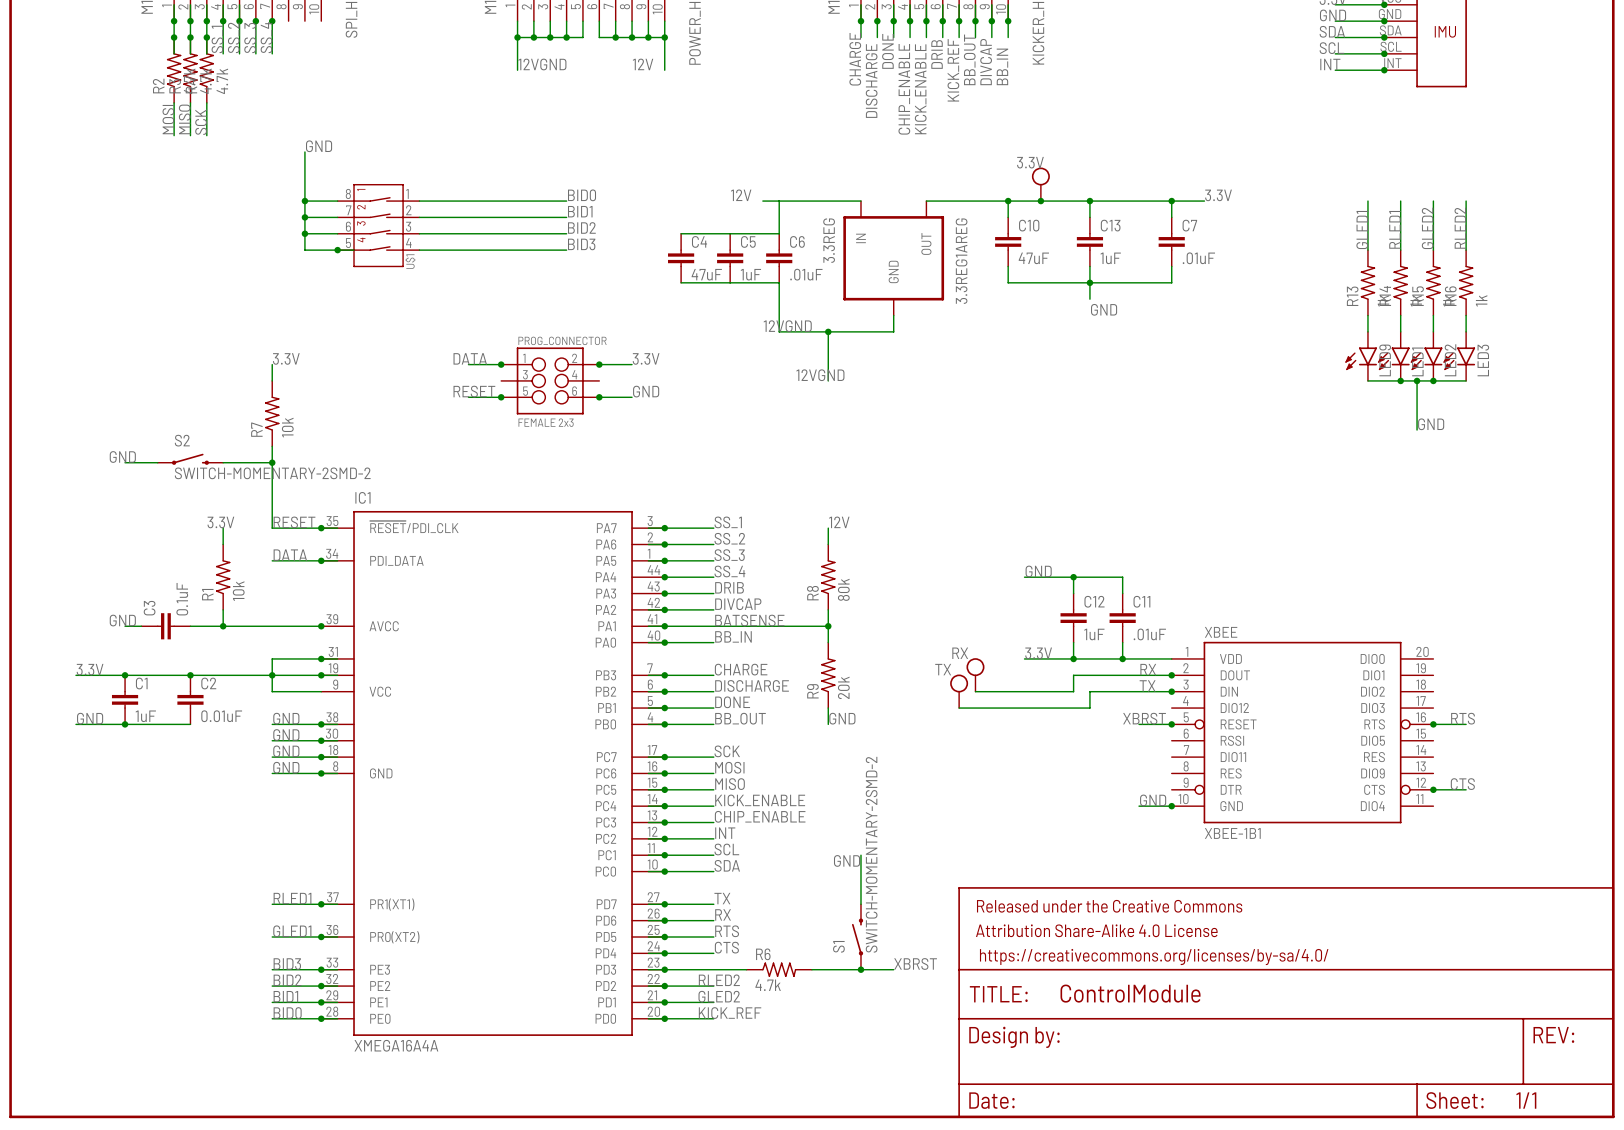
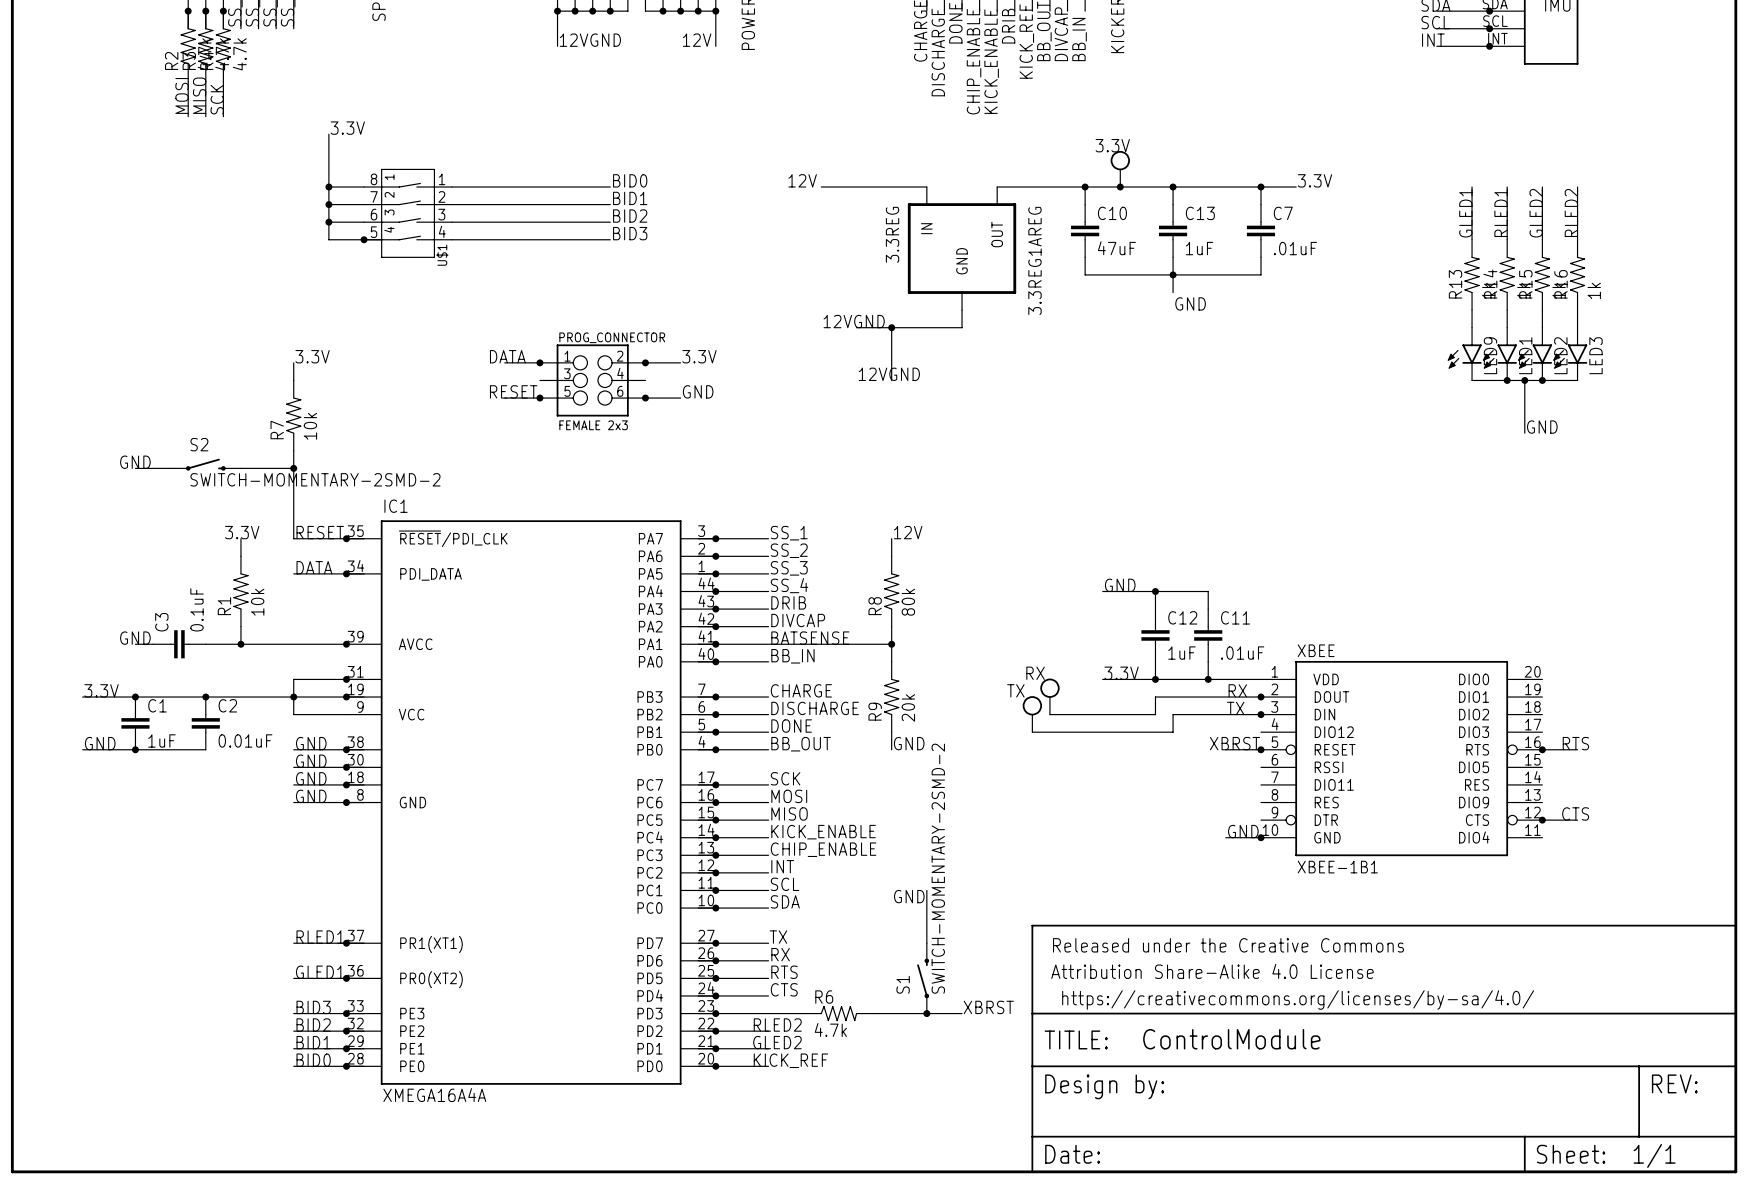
label: GND (319, 146) -> 3.3V (347, 128)
wire: (779, 201) (779, 233) (681, 233) -> none
C4: 47uF (681, 258) -> none
C5: 1uF (730, 258) -> none
C6: .01uF (779, 258) -> none
wire: (681, 282) (779, 282) (779, 331) (795, 331) -> none

